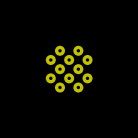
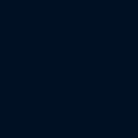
part: (69, 69) -> none

